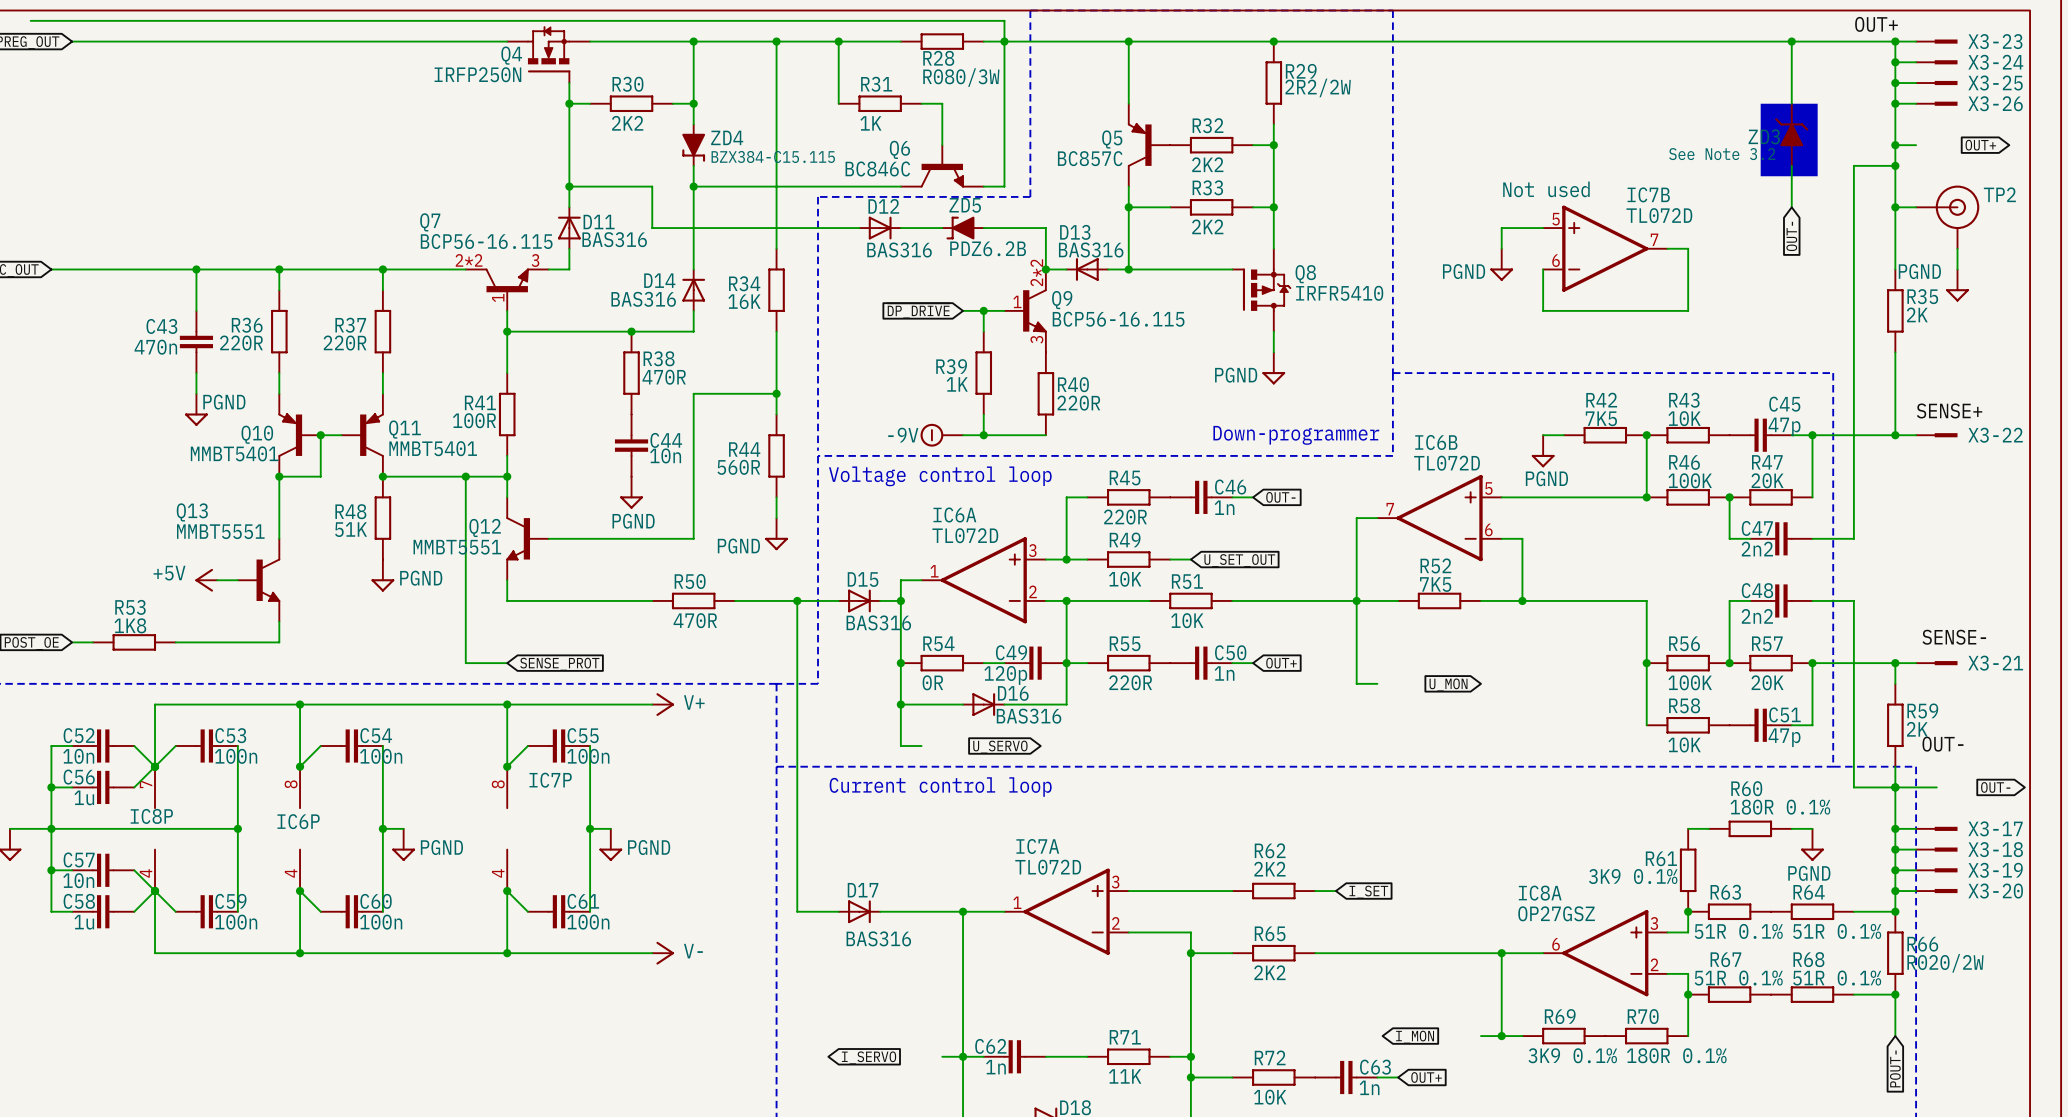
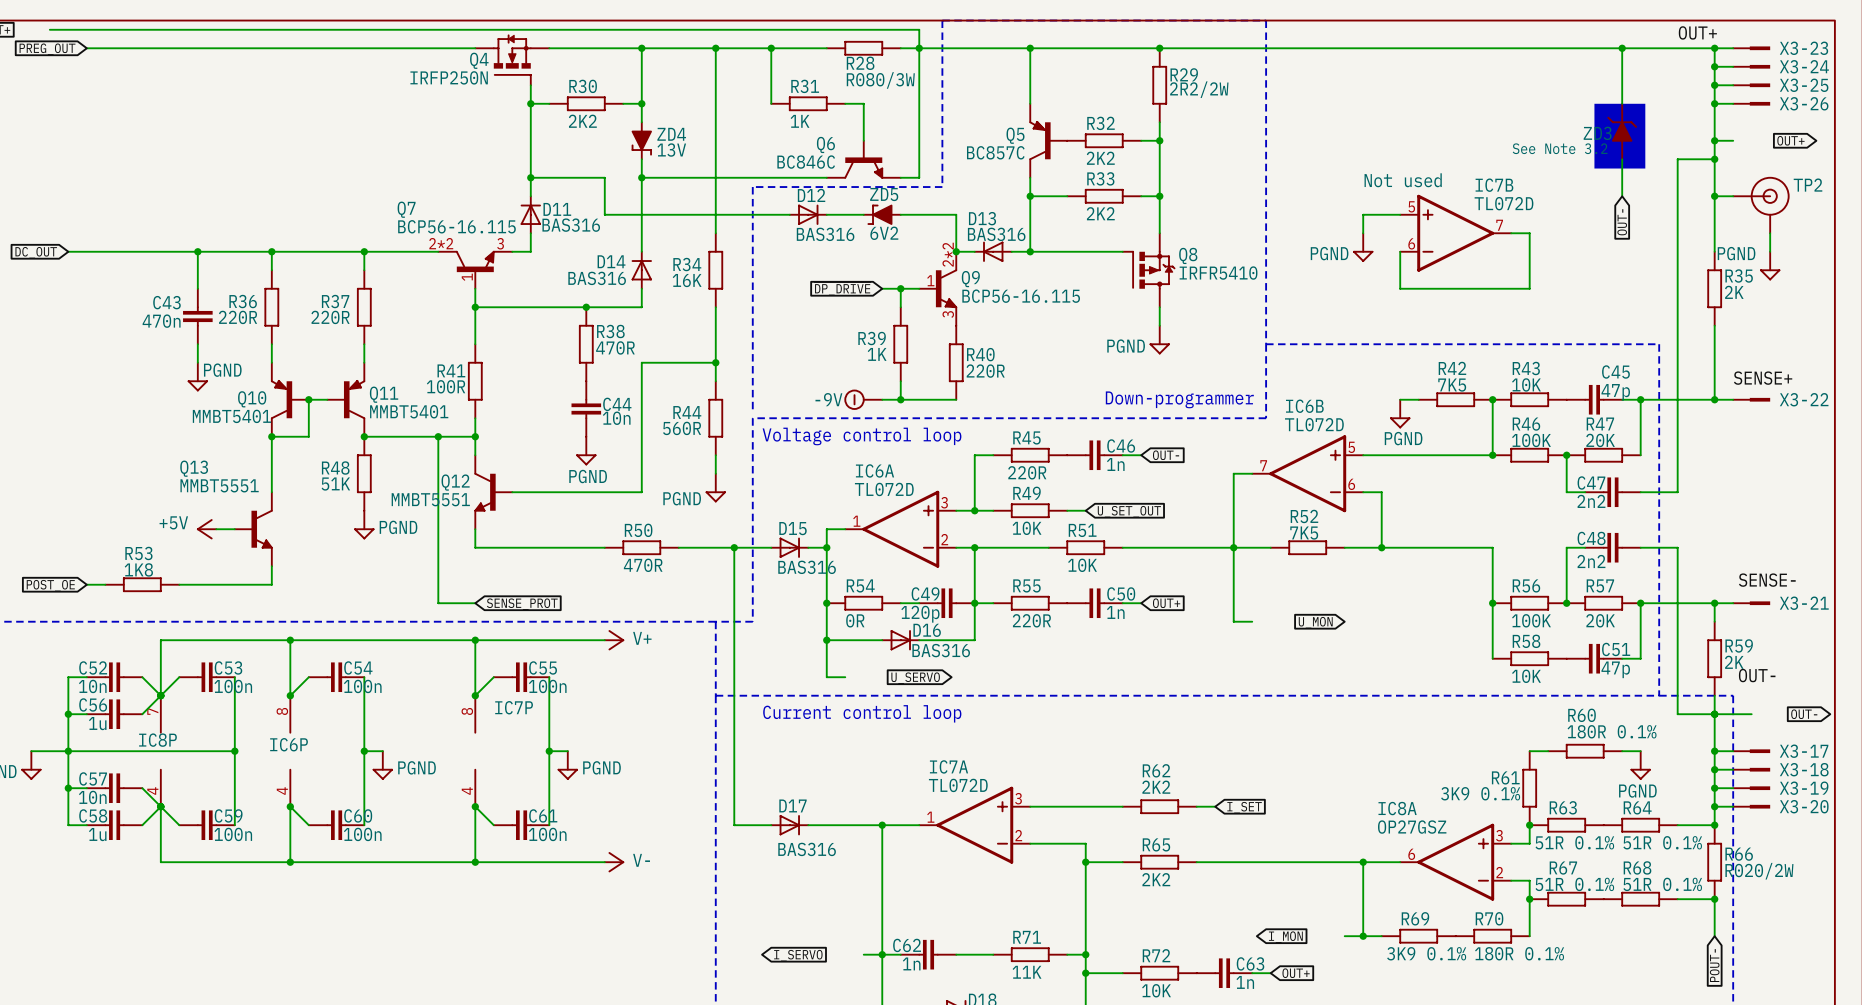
ZD4 value: BZX384-C15.115 (773, 156) -> 13V (671, 150)
ZD5 value: PDZ6.2B (988, 248) -> 6V2 (884, 233)

